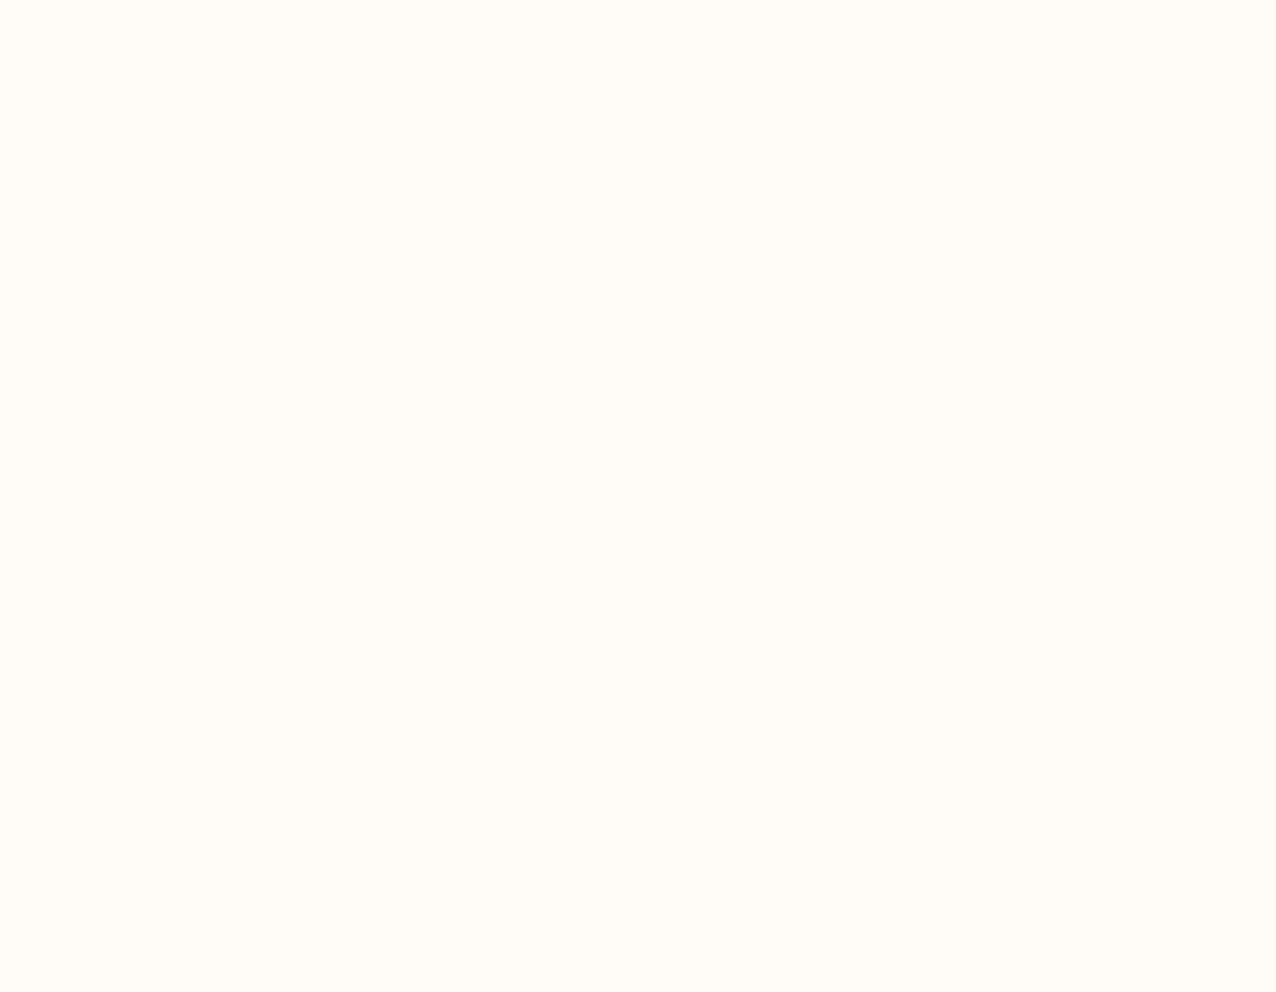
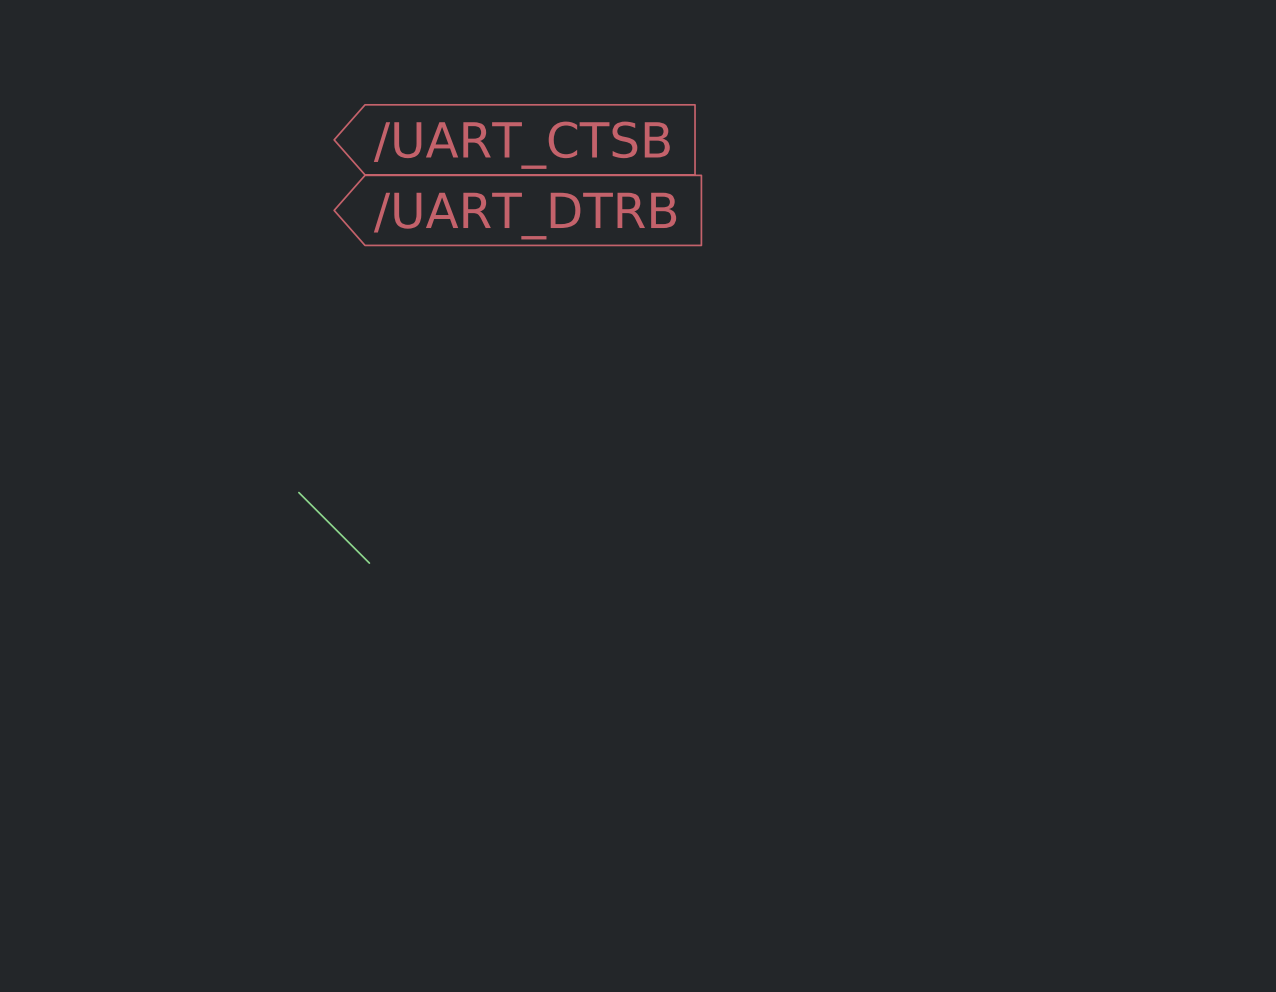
global label: none -> /UART_CTSB (521, 145)
global label: none -> /UART_DTRB (525, 216)
wire: none -> (298, 492) (369, 563)

